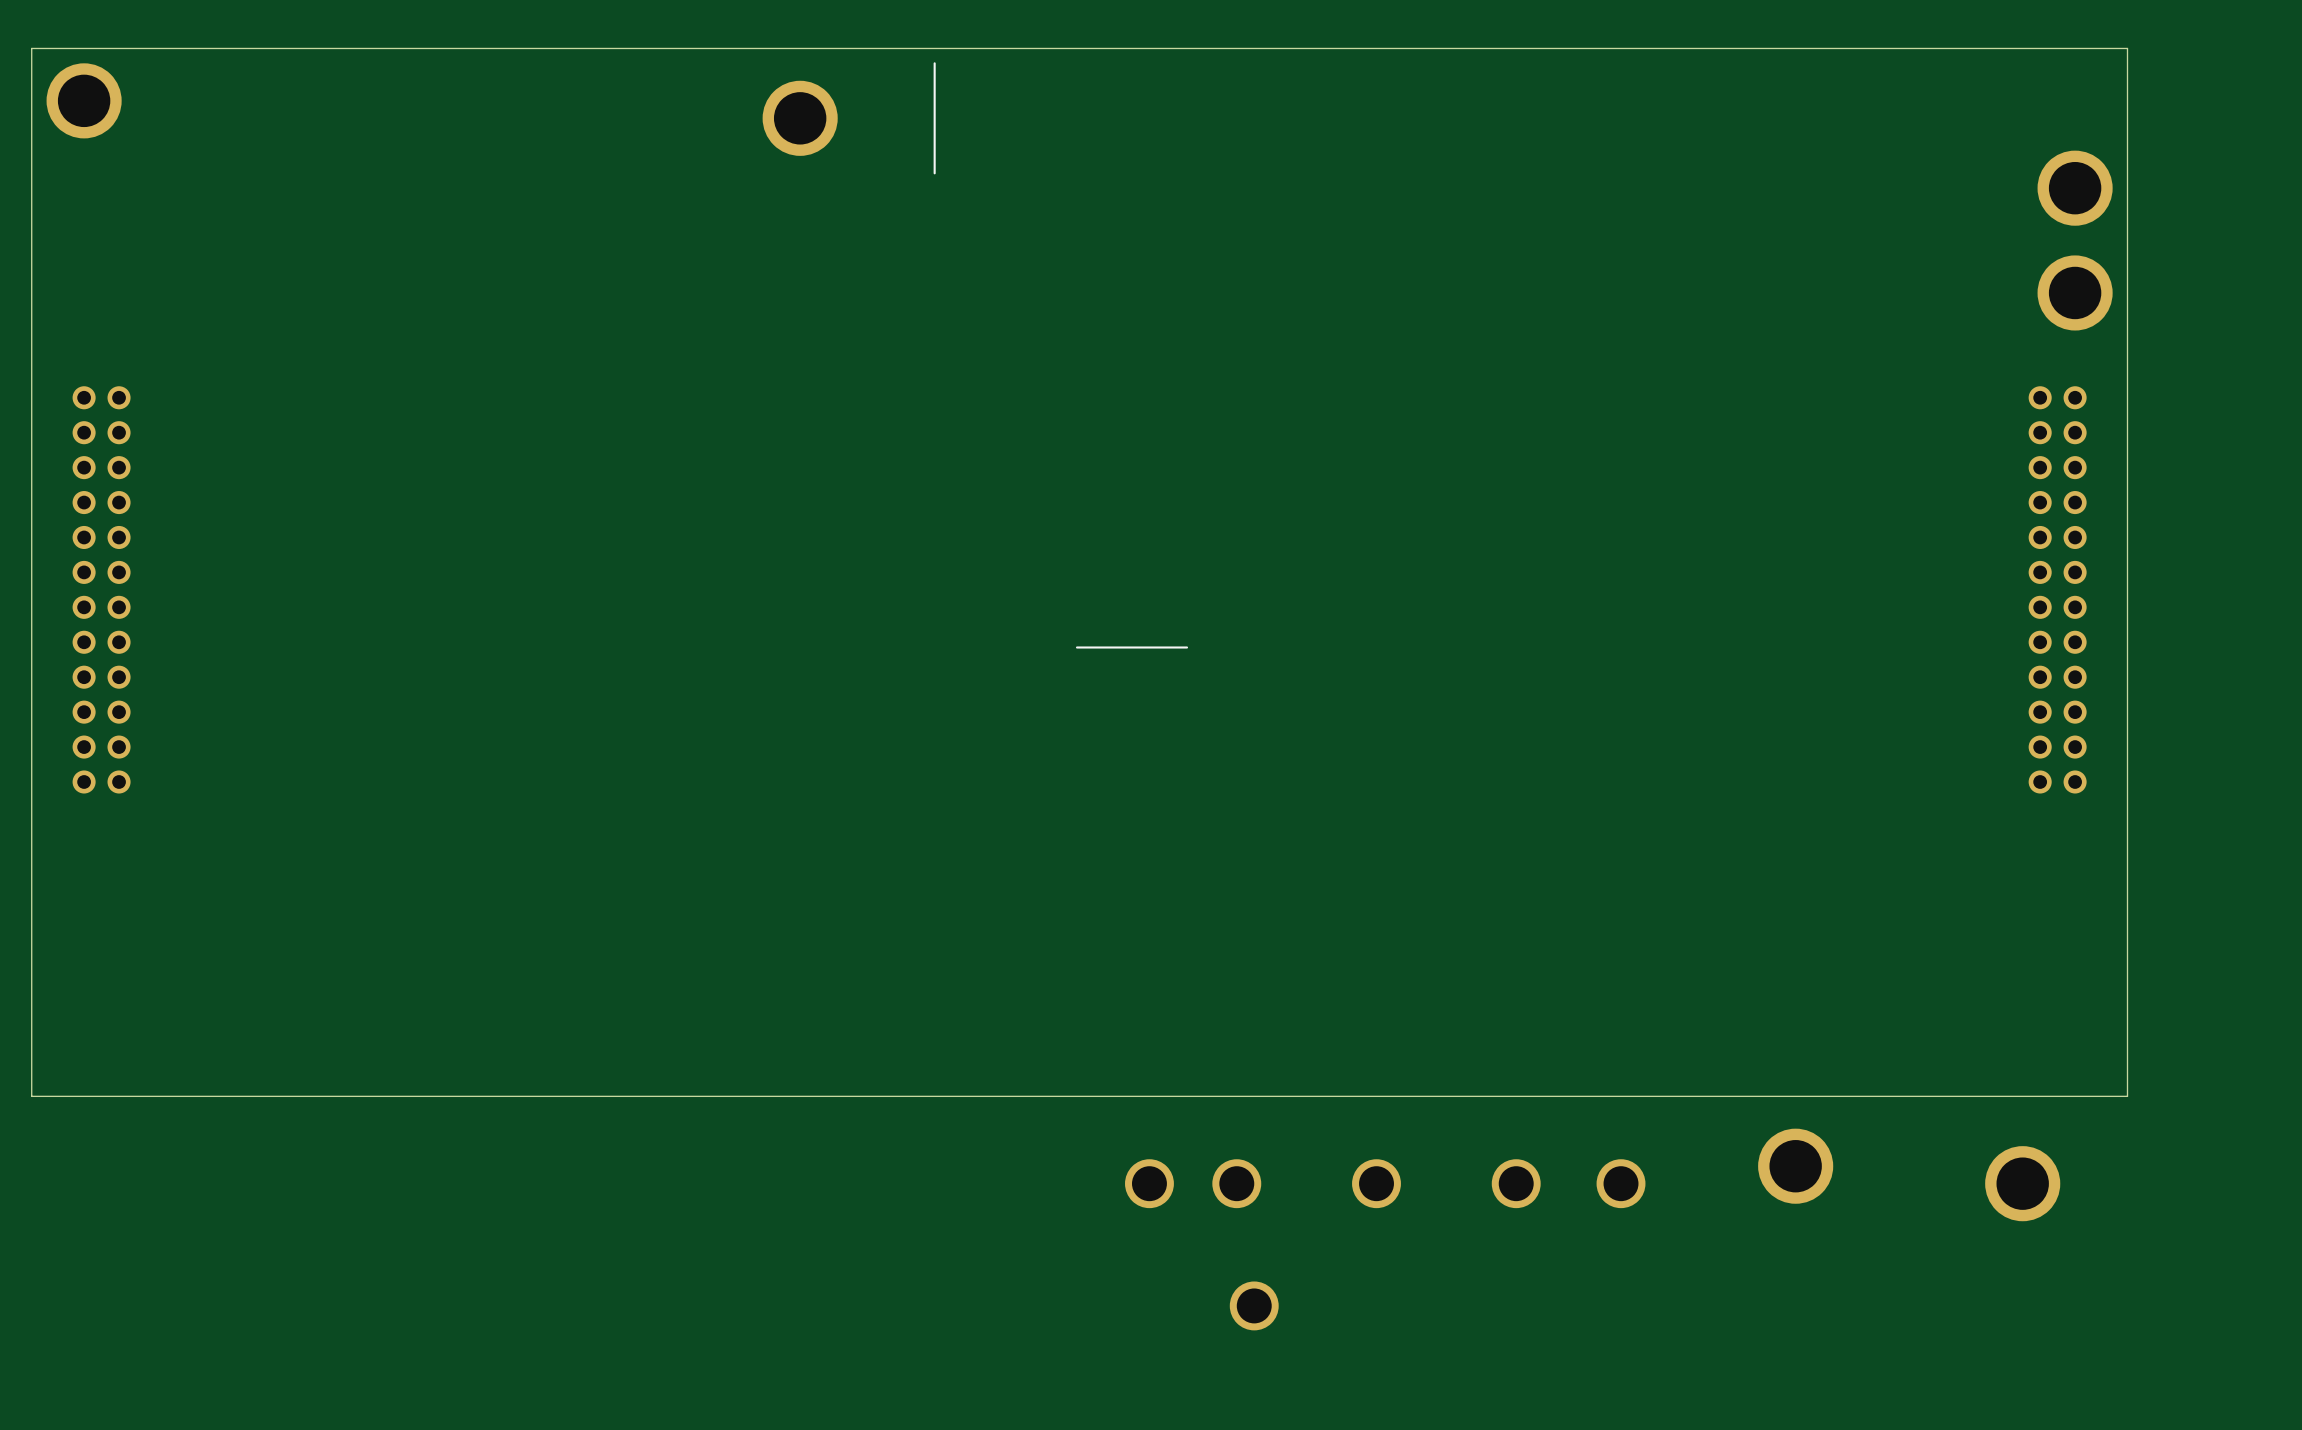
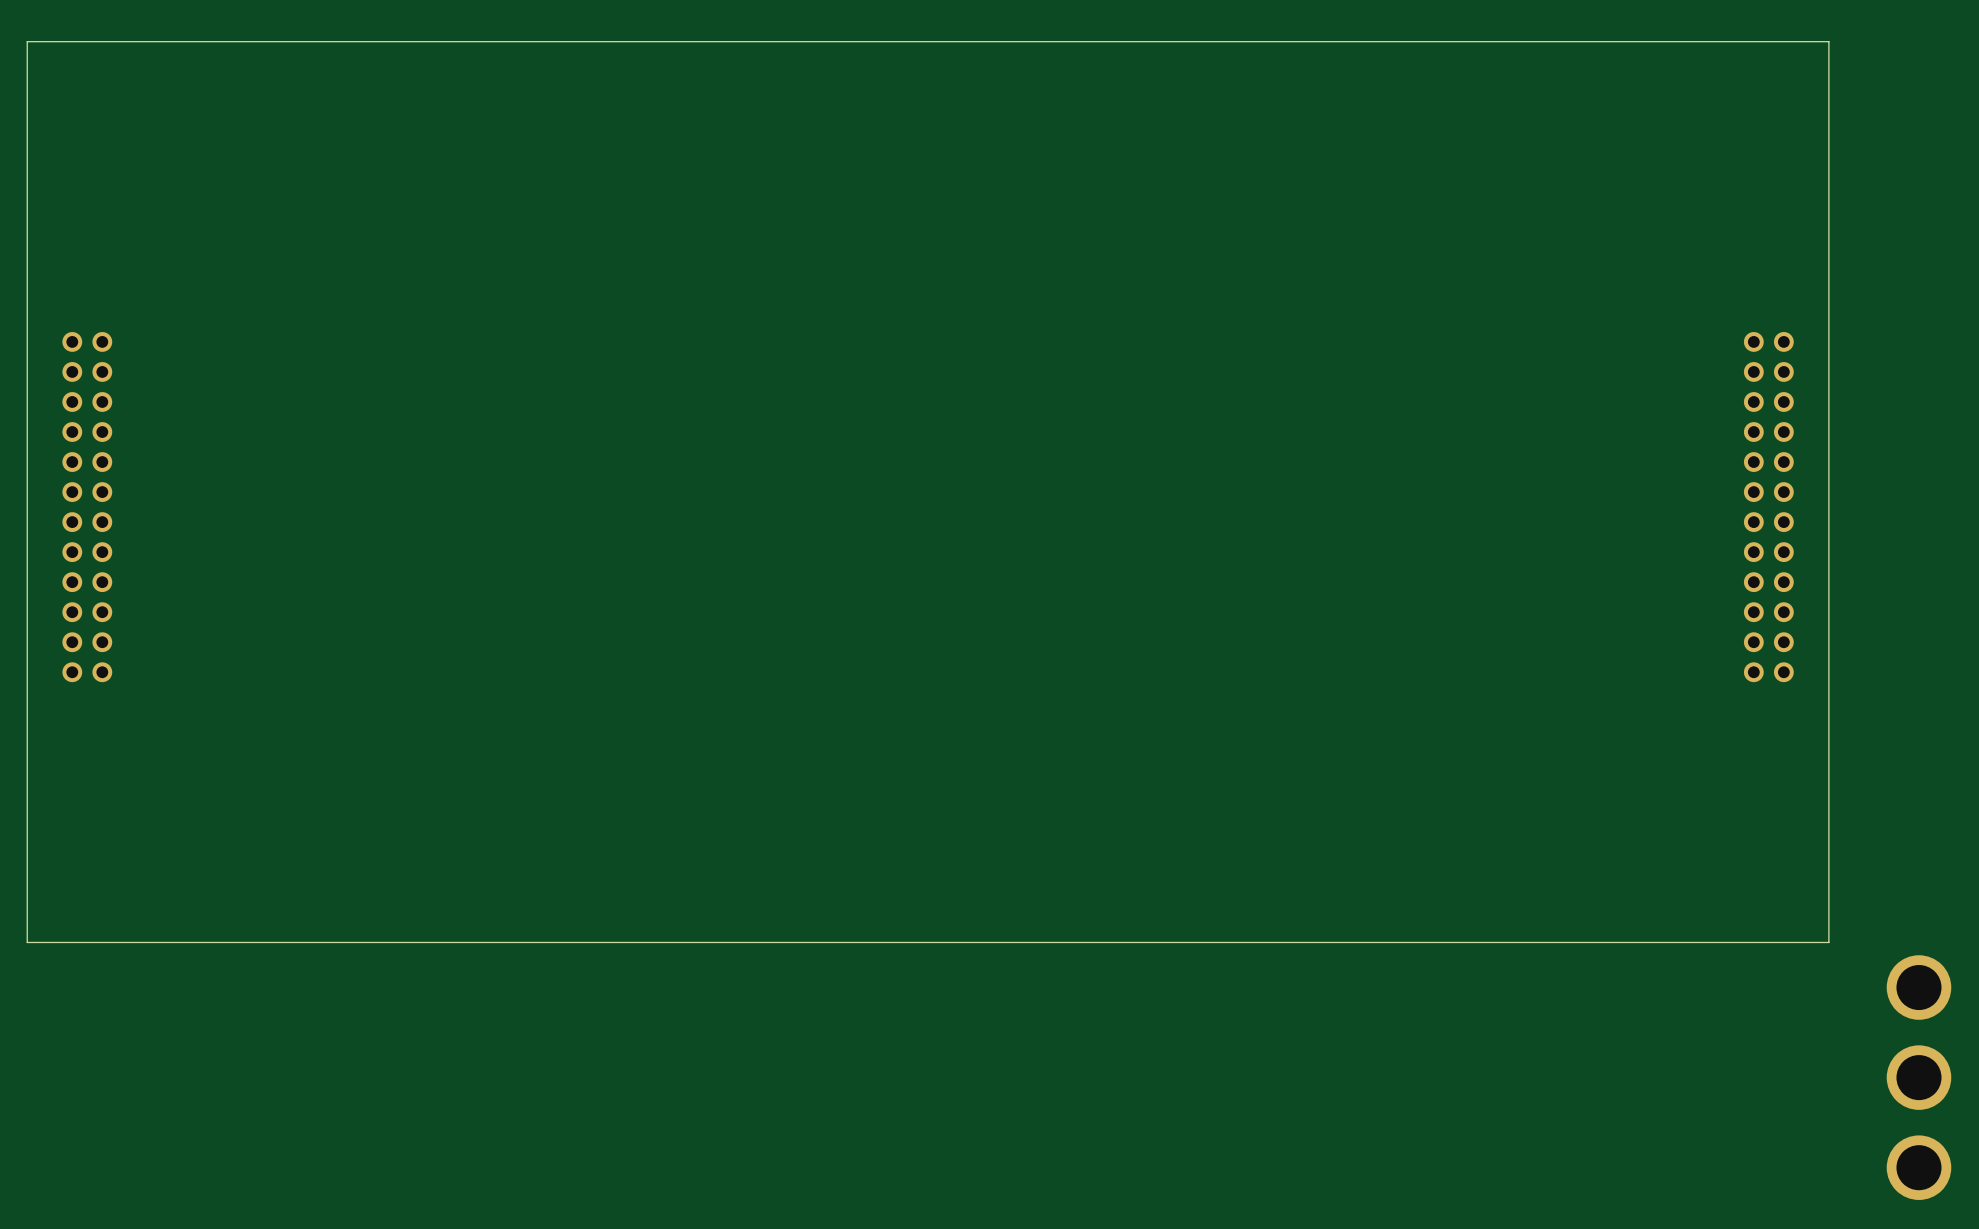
part: (84, 100) -> none
part: (800, 118) -> none
part: (934, 118) -> none
part: (2075, 188) -> none
part: (2075, 292) -> none
part: (1131, 647) -> none
part: none -> (1918, 987)
part: (1795, 1166) -> none
part: (1149, 1183) -> none
part: (1236, 1183) -> none
part: (1376, 1183) -> none
part: (1516, 1183) -> none
part: (1621, 1183) -> none
part: (2022, 1183) -> none
part: none -> (1918, 1077)
part: (1254, 1305) -> none
part: none -> (1918, 1167)

